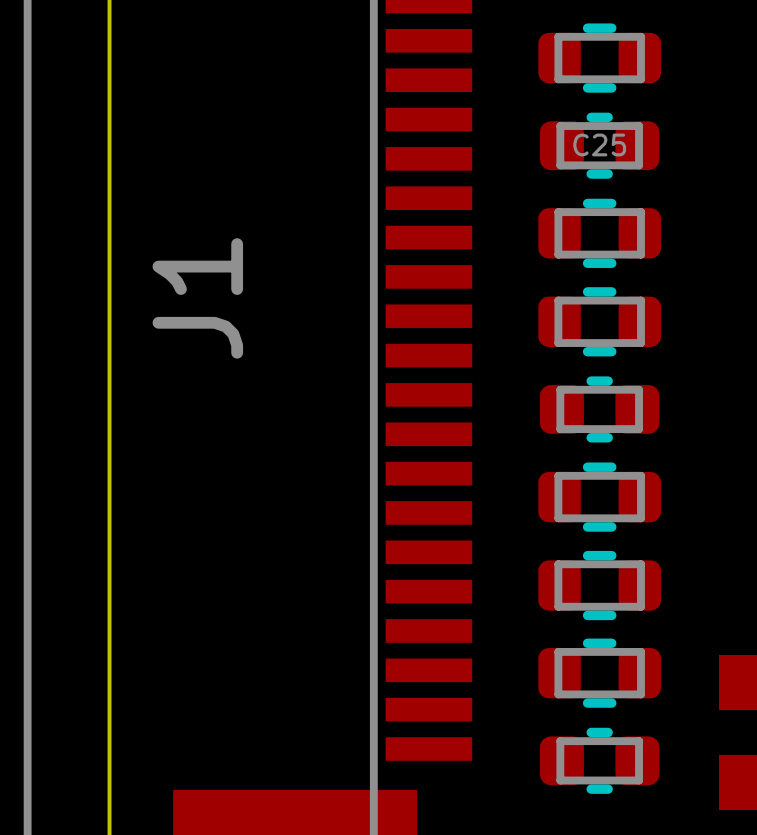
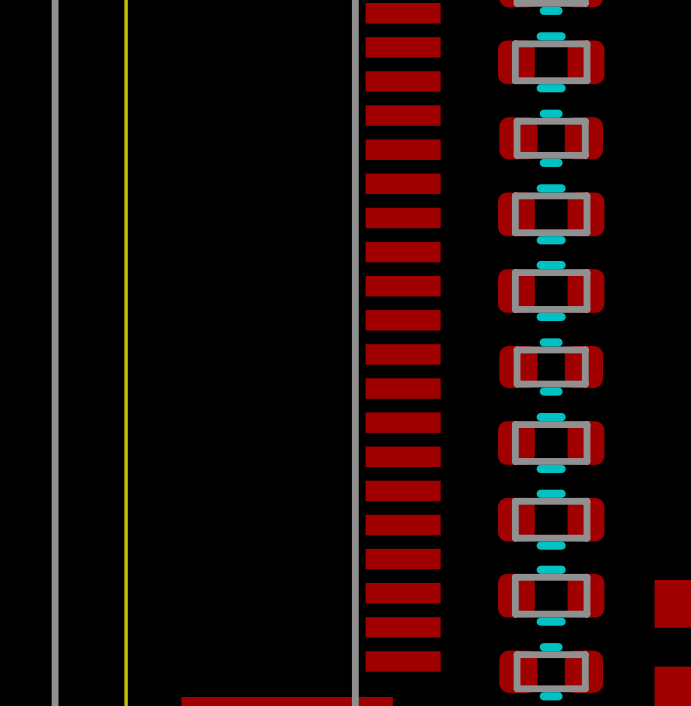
C25 name: C25 (599, 144) -> none
J1 name: J1 (197, 298) -> none

